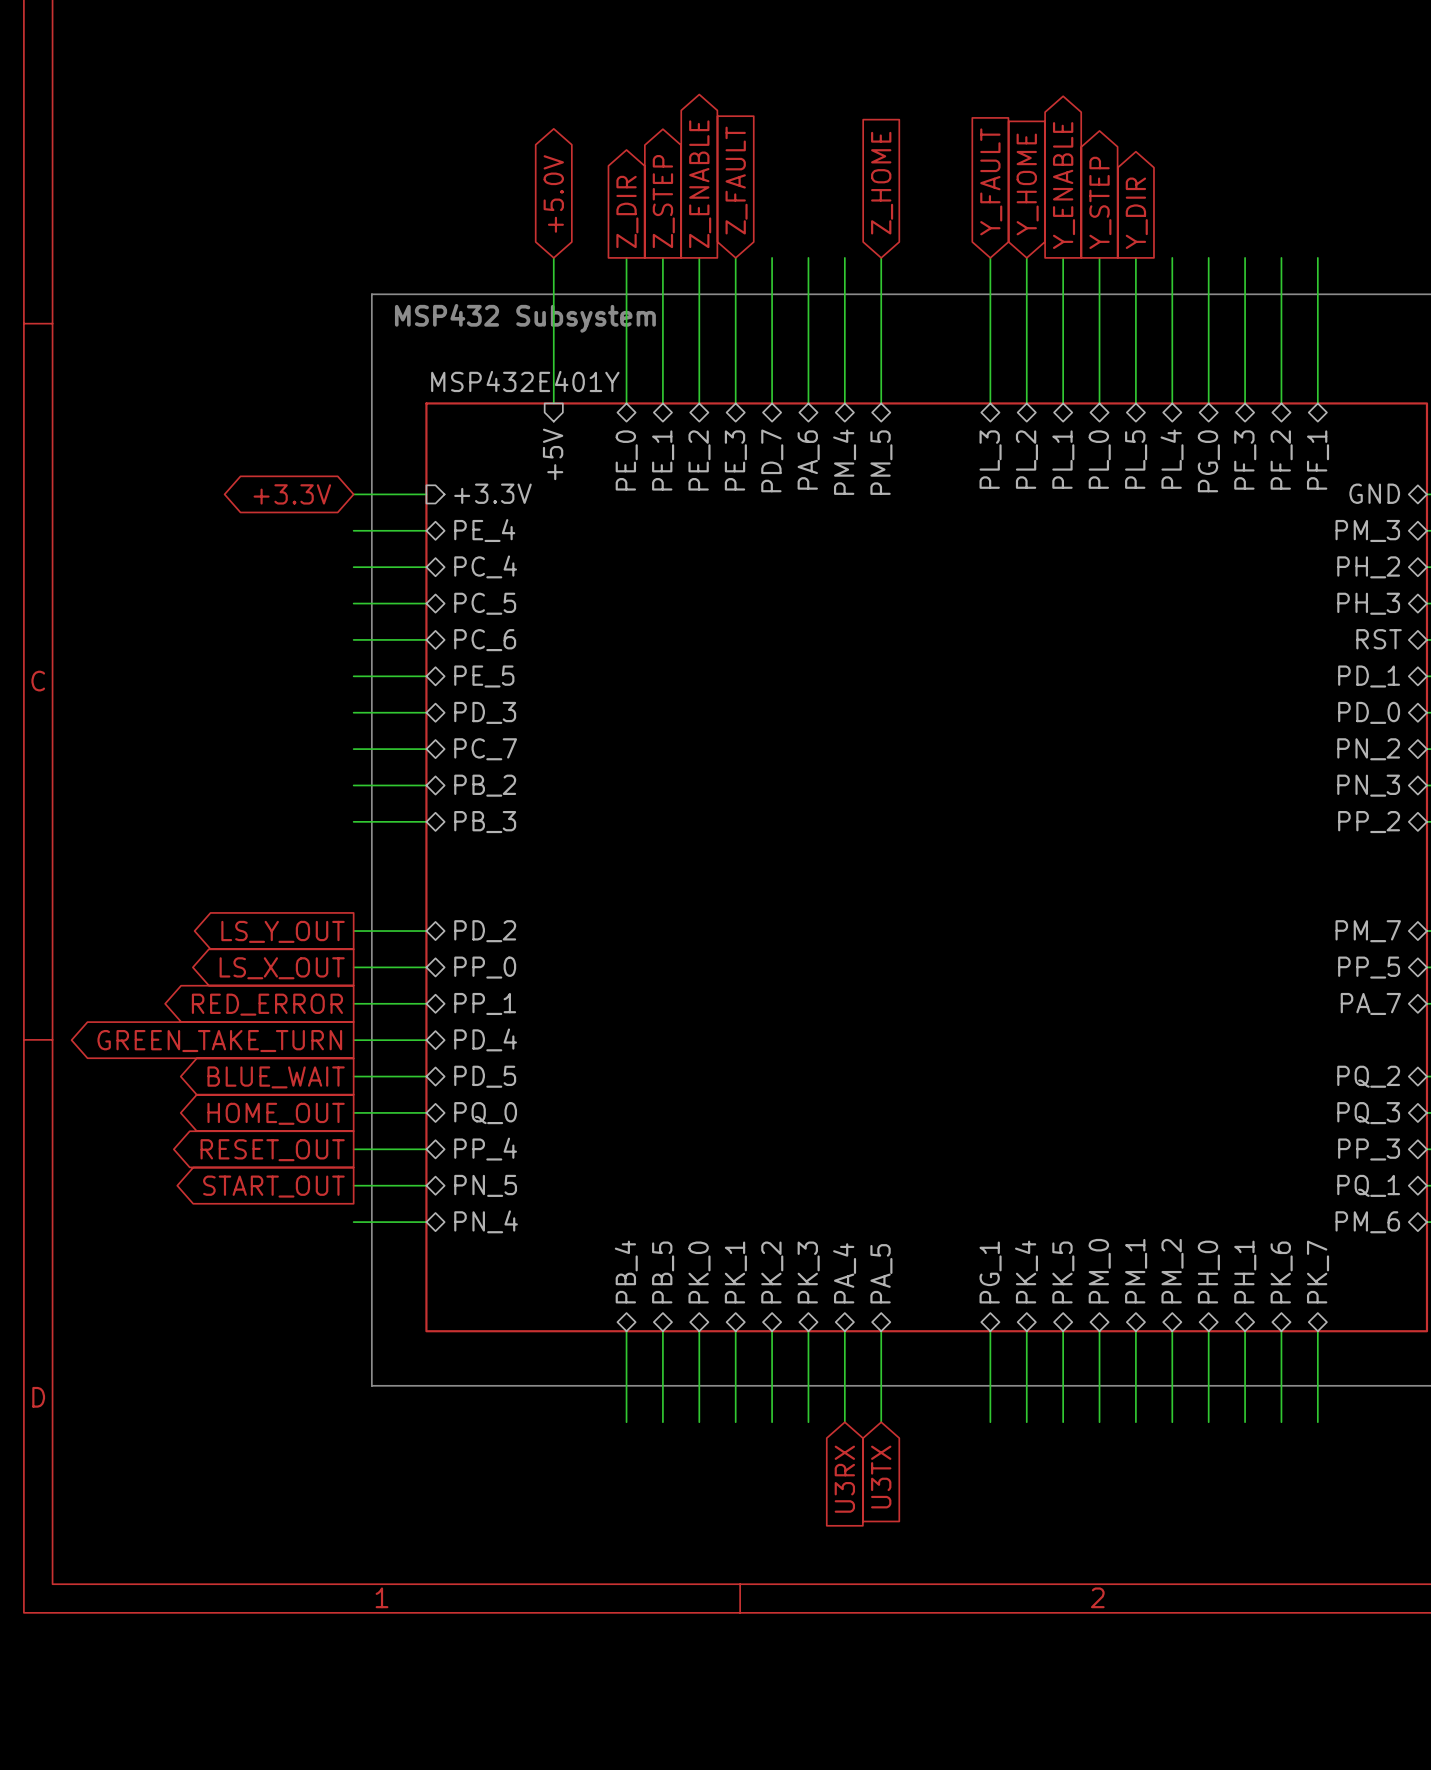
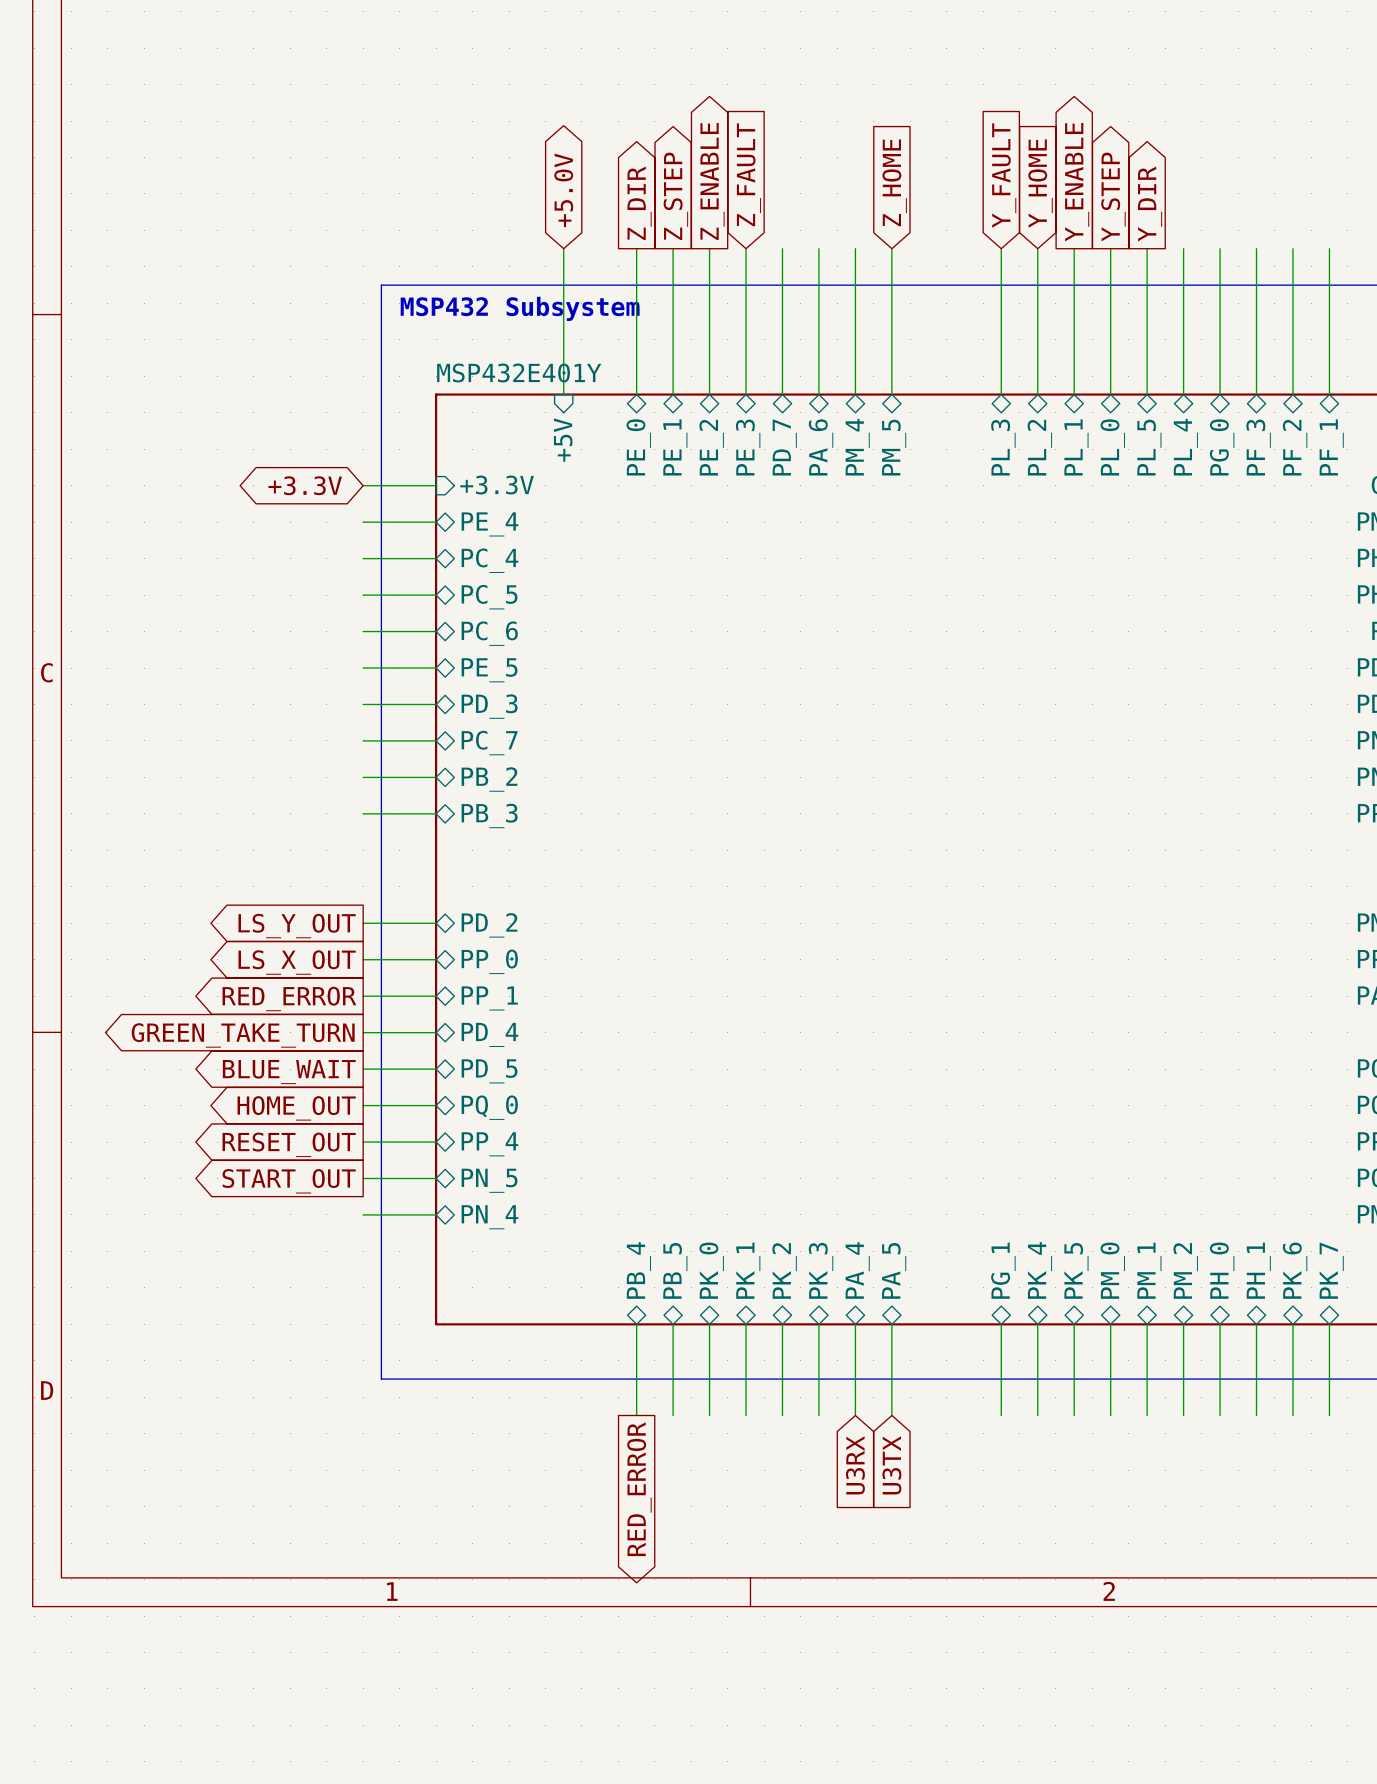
global label: none -> RED_ERROR (639, 1489)

